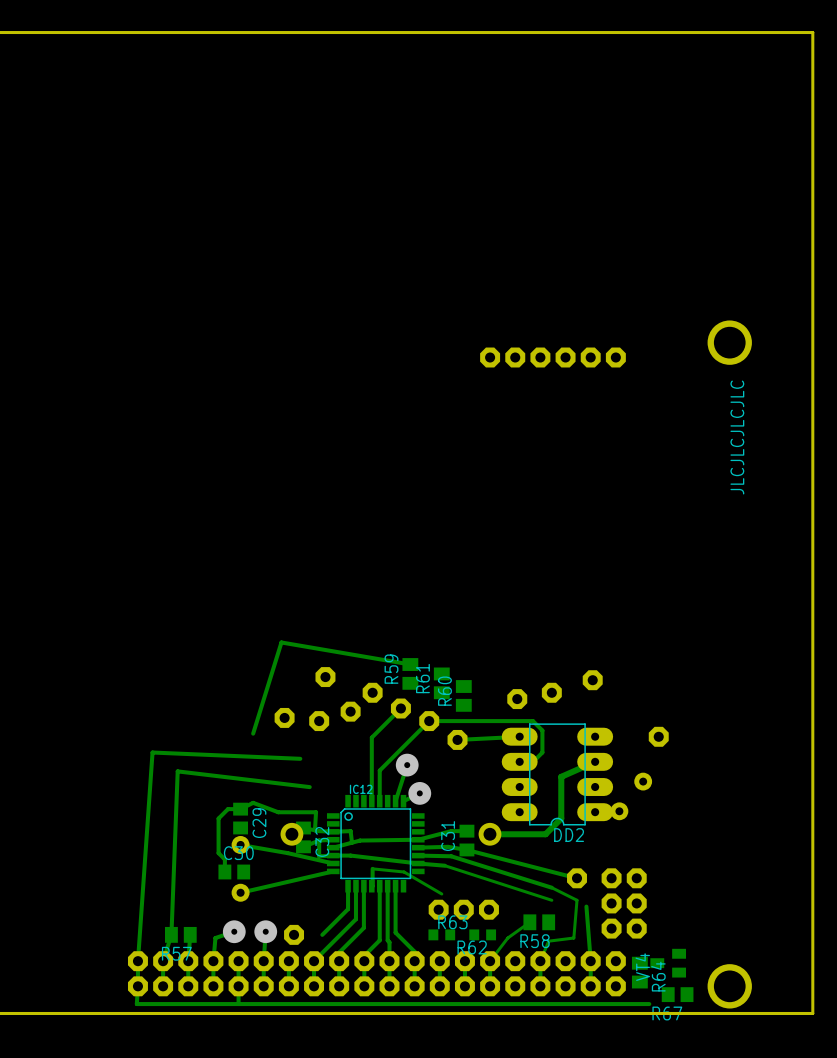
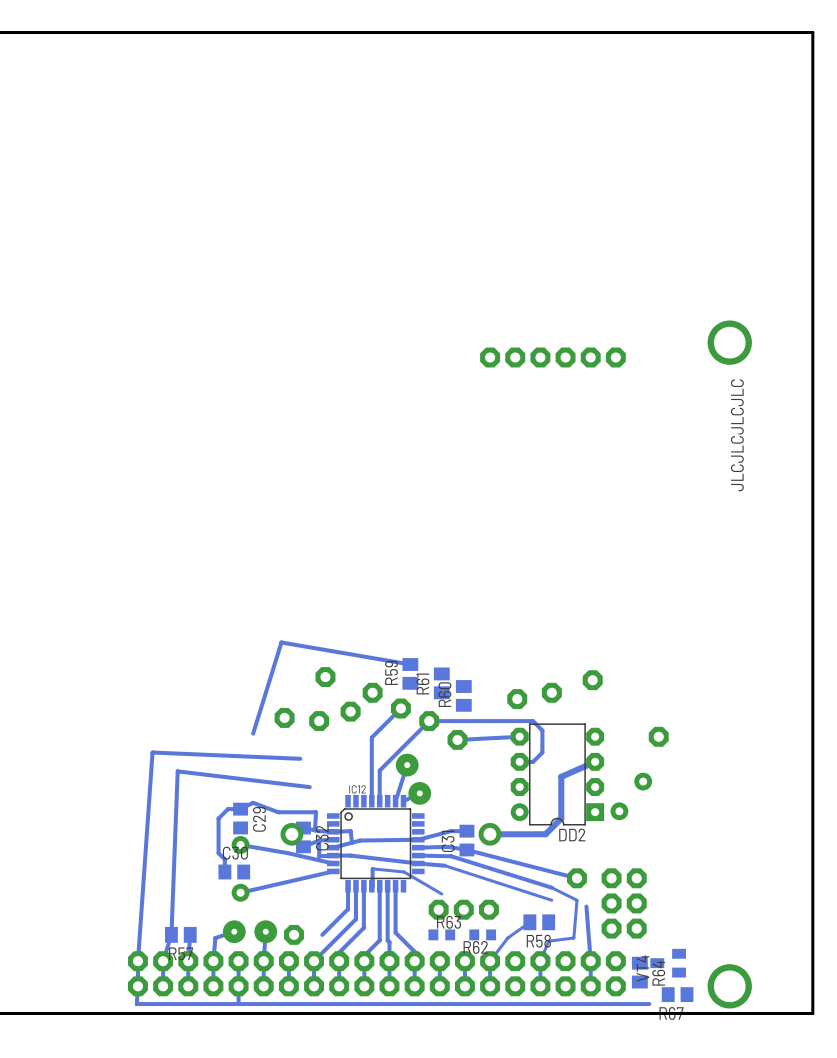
DD2 footprint: [501, 723, 614, 826] -> [510, 723, 605, 826]

